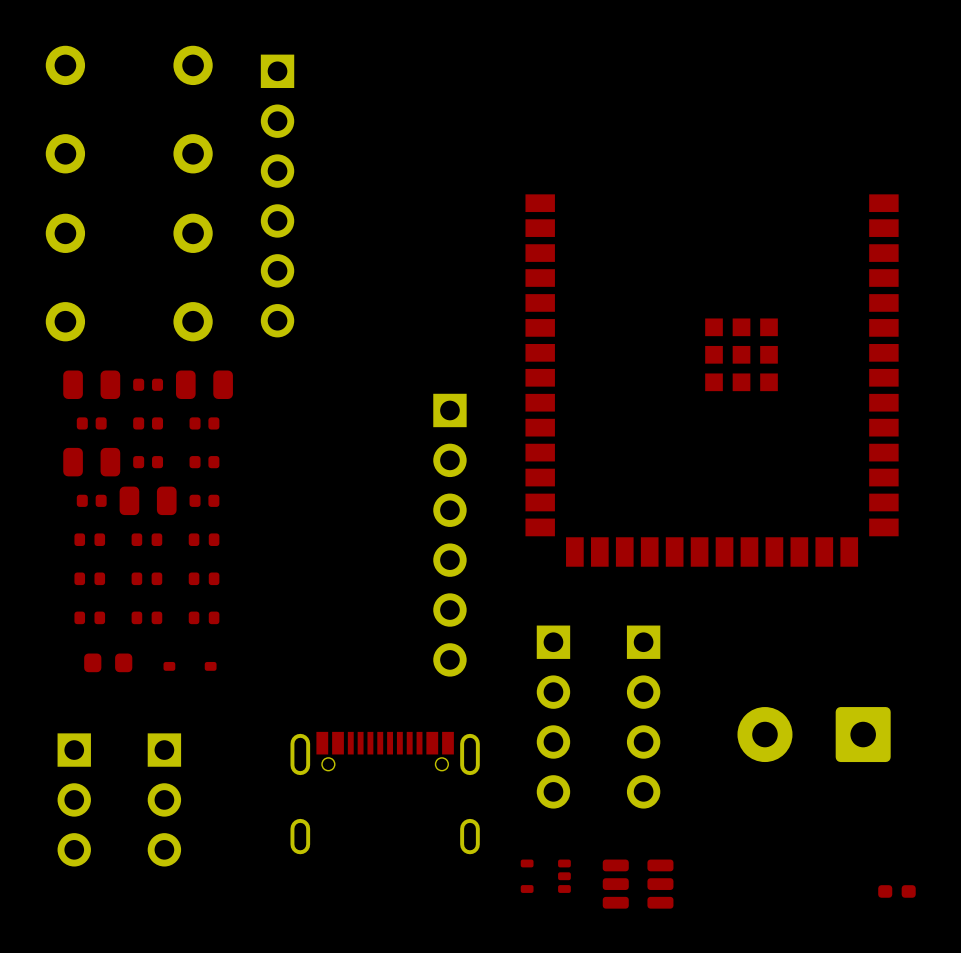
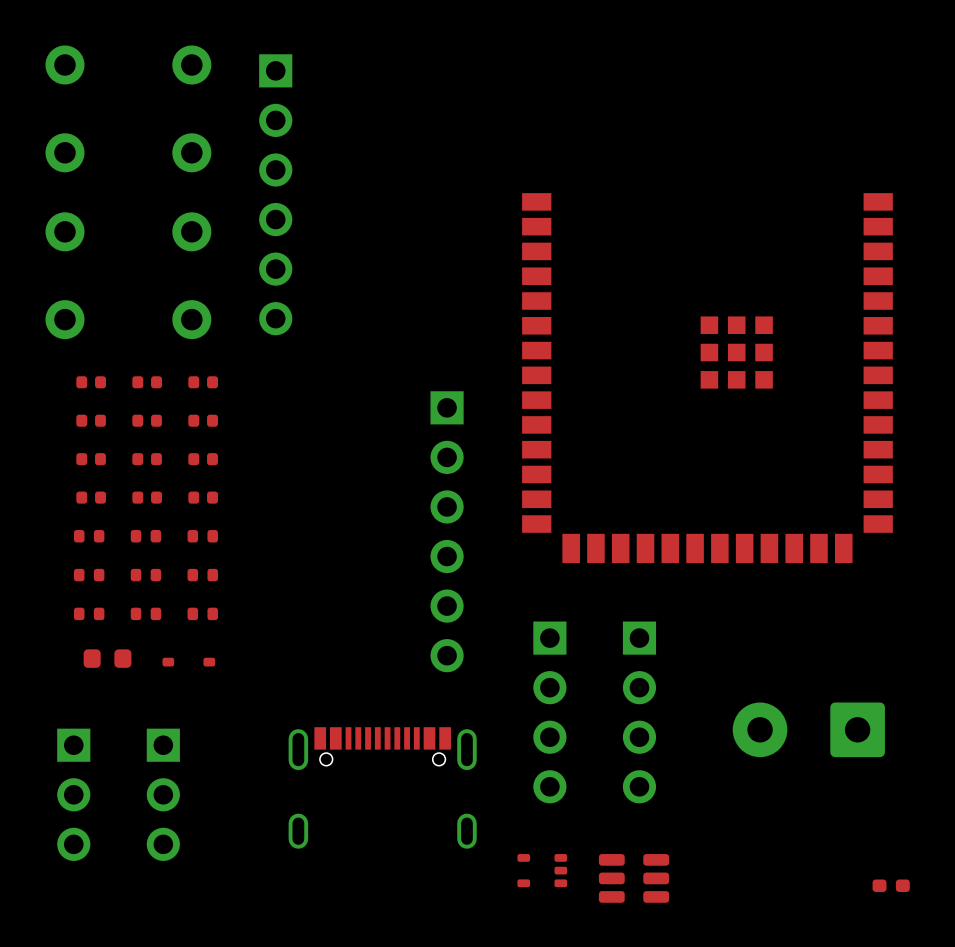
part footprint: [63, 370, 121, 399] -> [76, 376, 106, 389]
part footprint: [175, 370, 233, 399] -> [188, 376, 218, 389]
part footprint: [63, 447, 121, 477] -> [76, 453, 106, 466]
part footprint: [119, 486, 177, 516] -> [132, 491, 162, 504]

